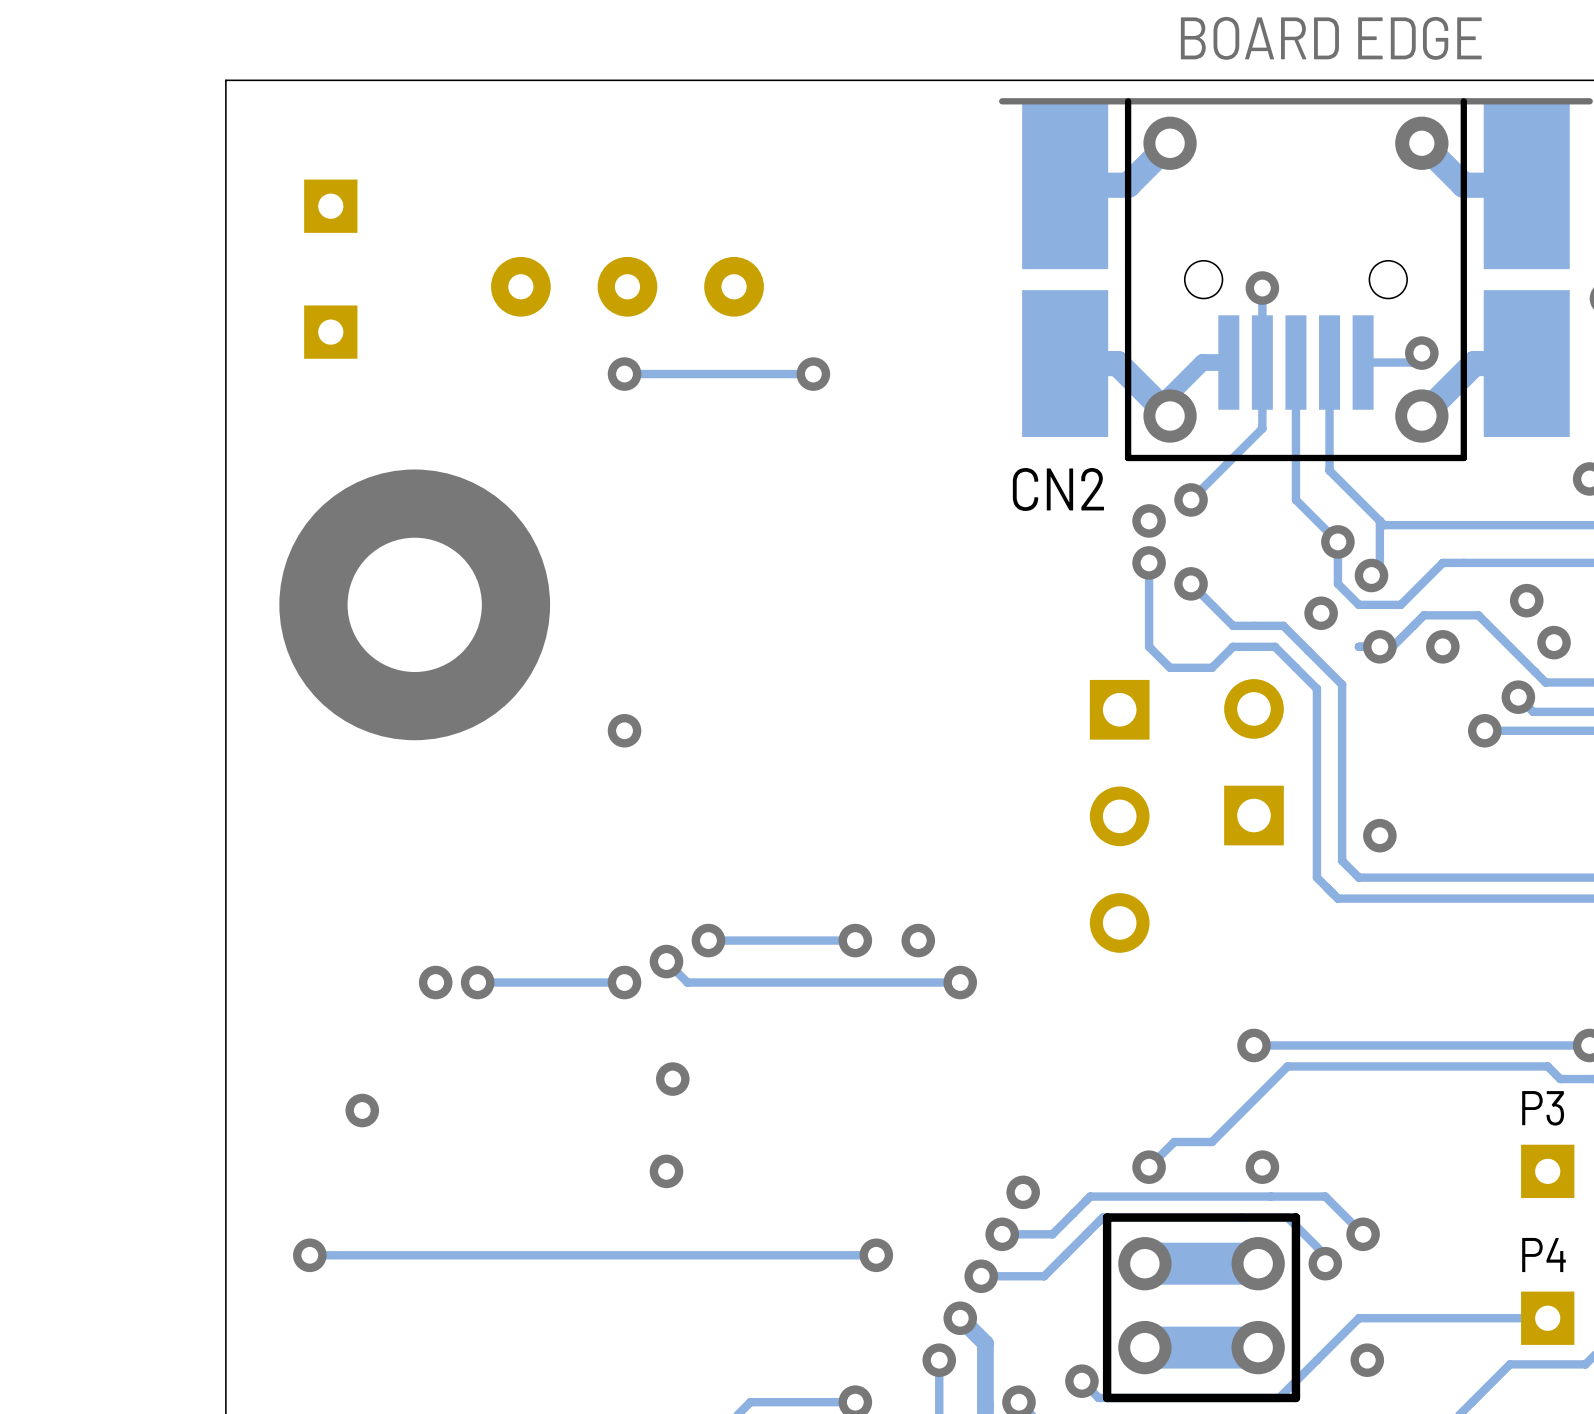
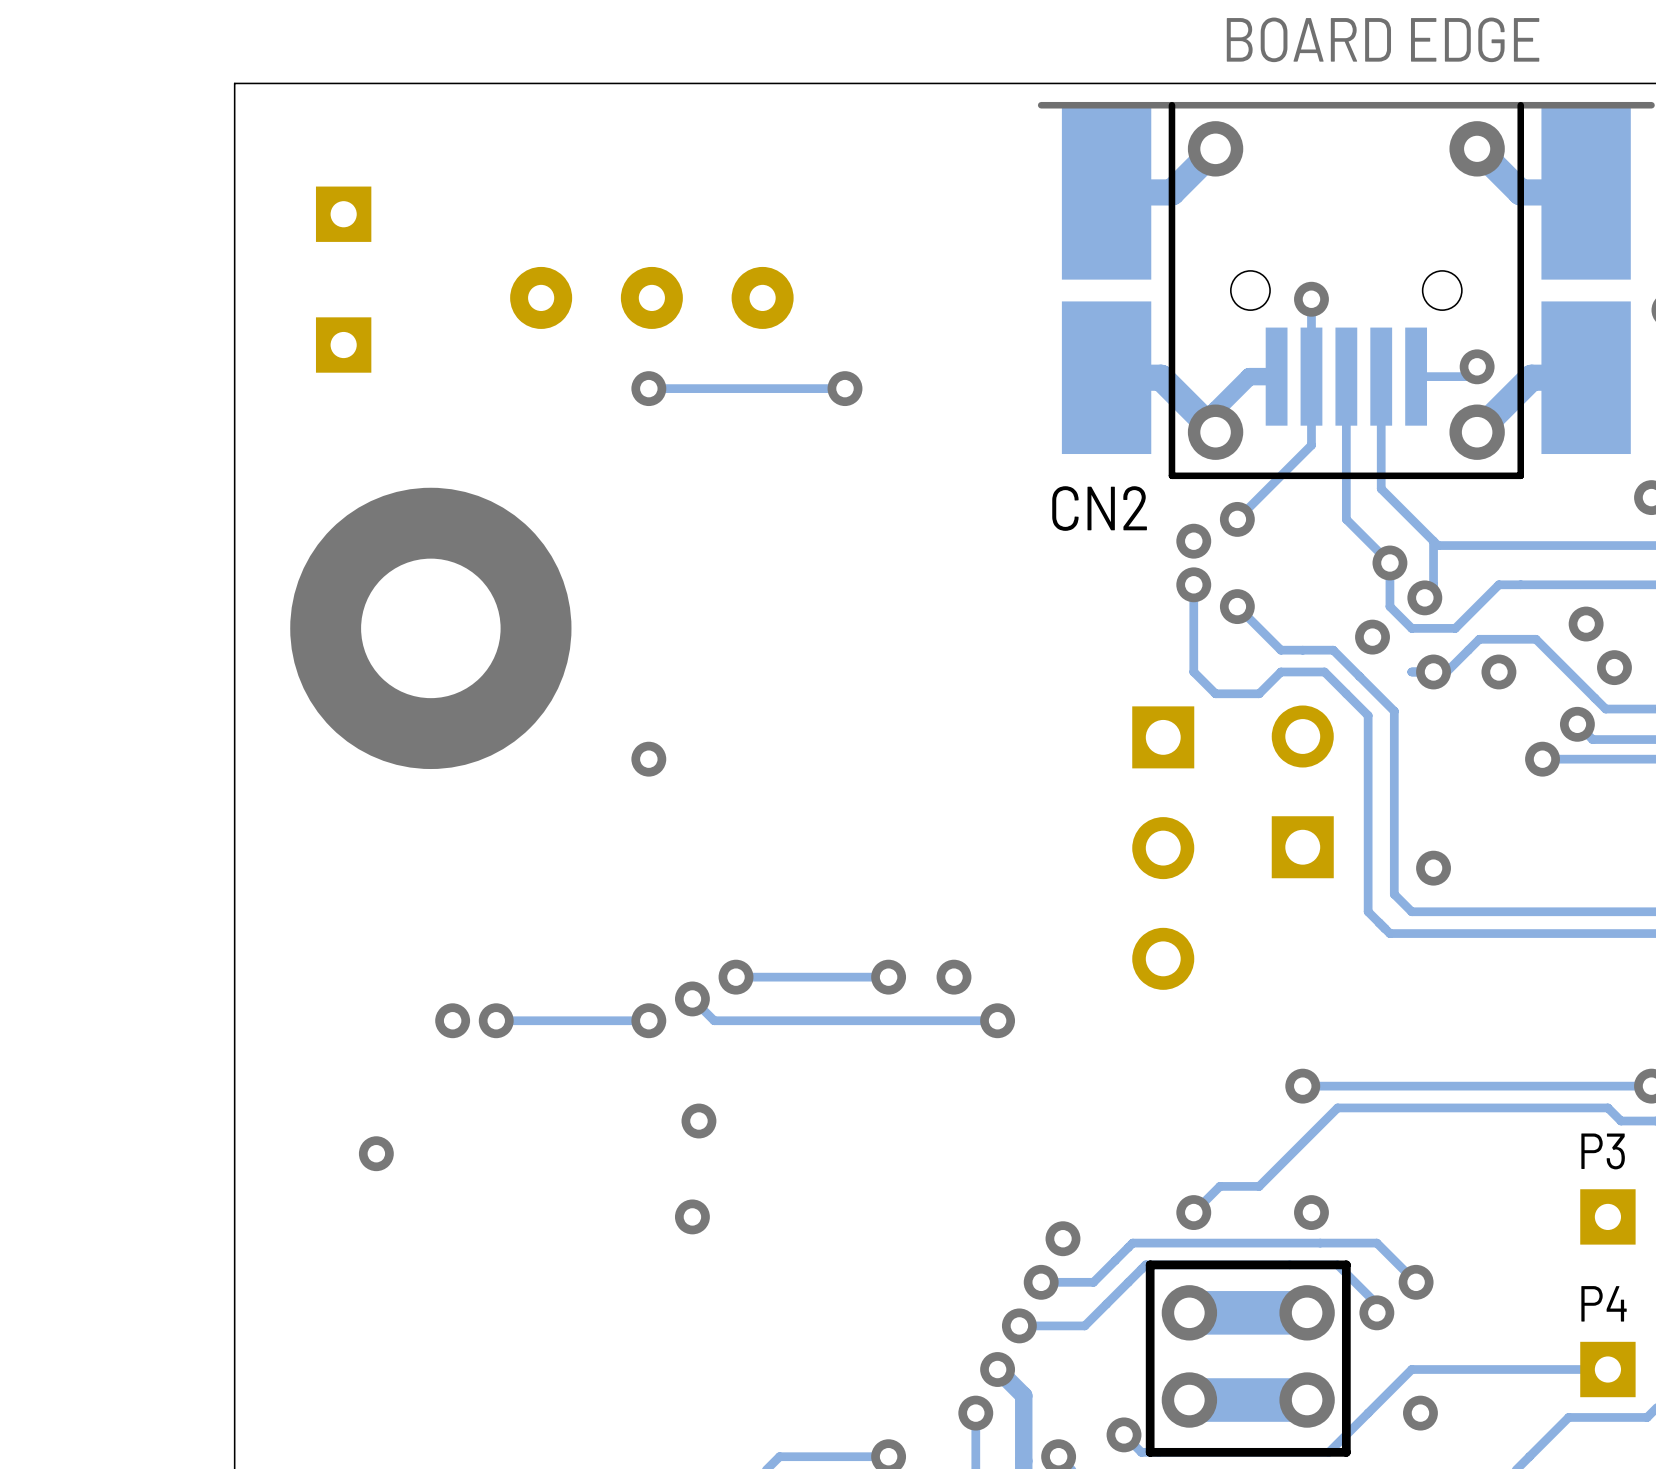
via: (309, 1255) -> none
track: (876, 1255) (309, 1255) -> none
via: (876, 1255) -> none

